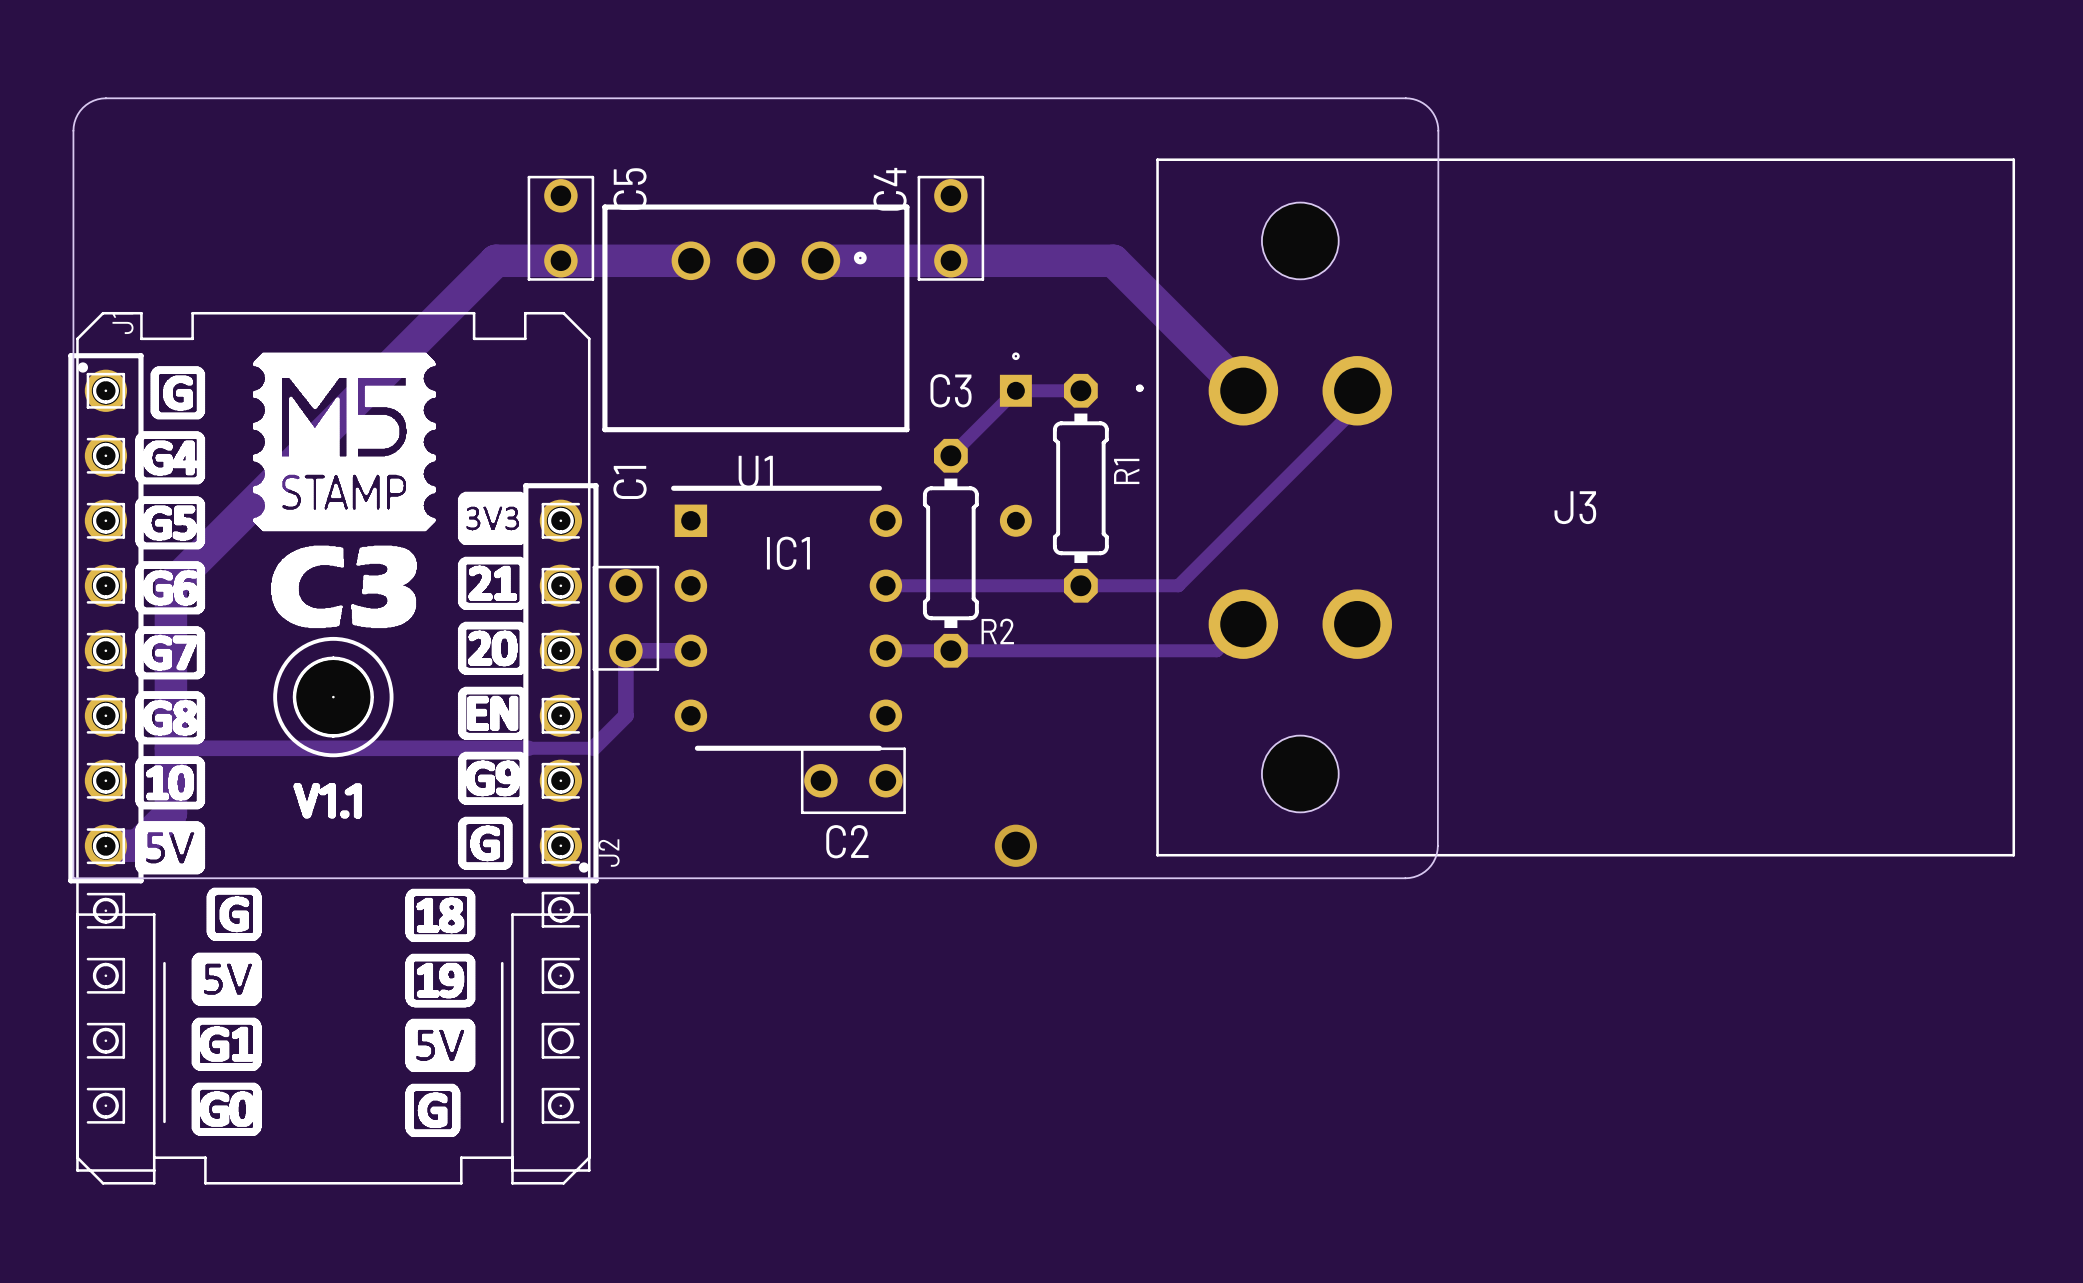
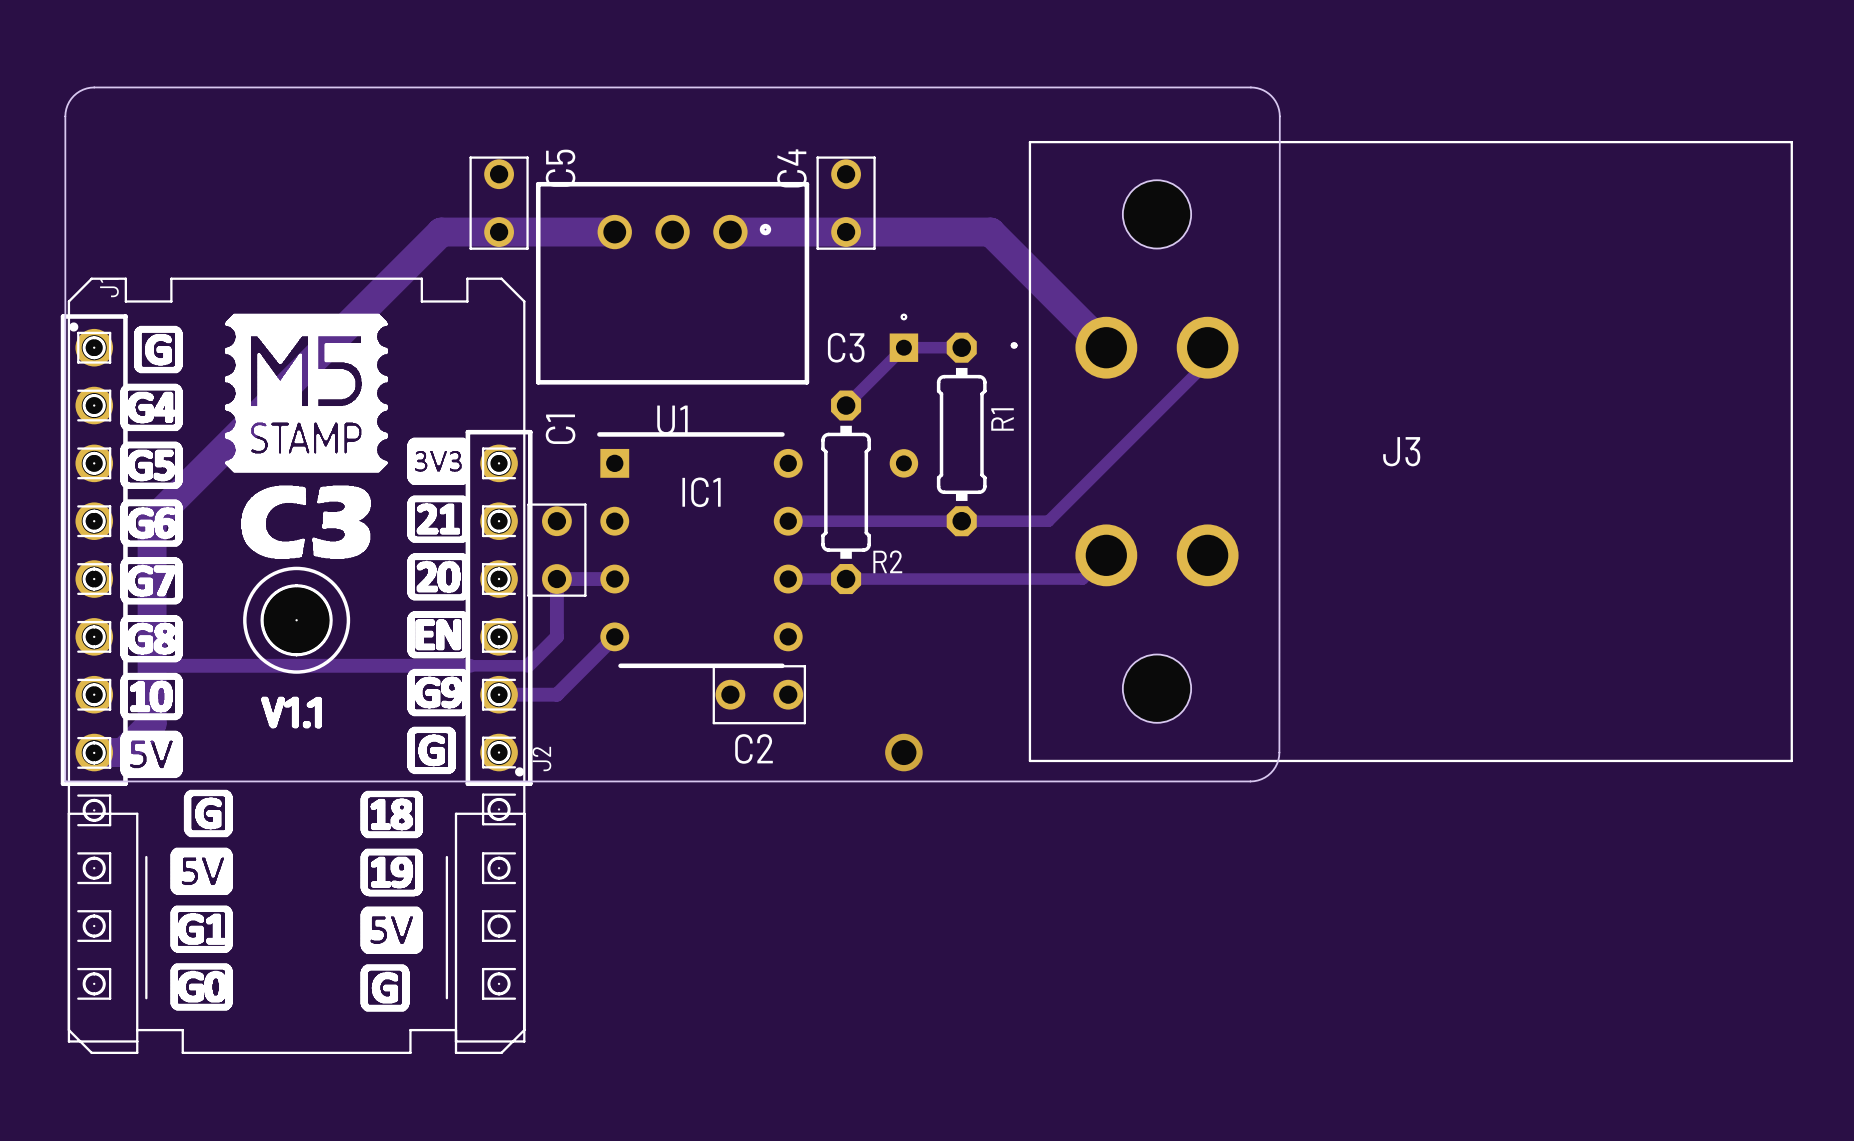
track: none -> (614, 636) (556, 694) (499, 694)

